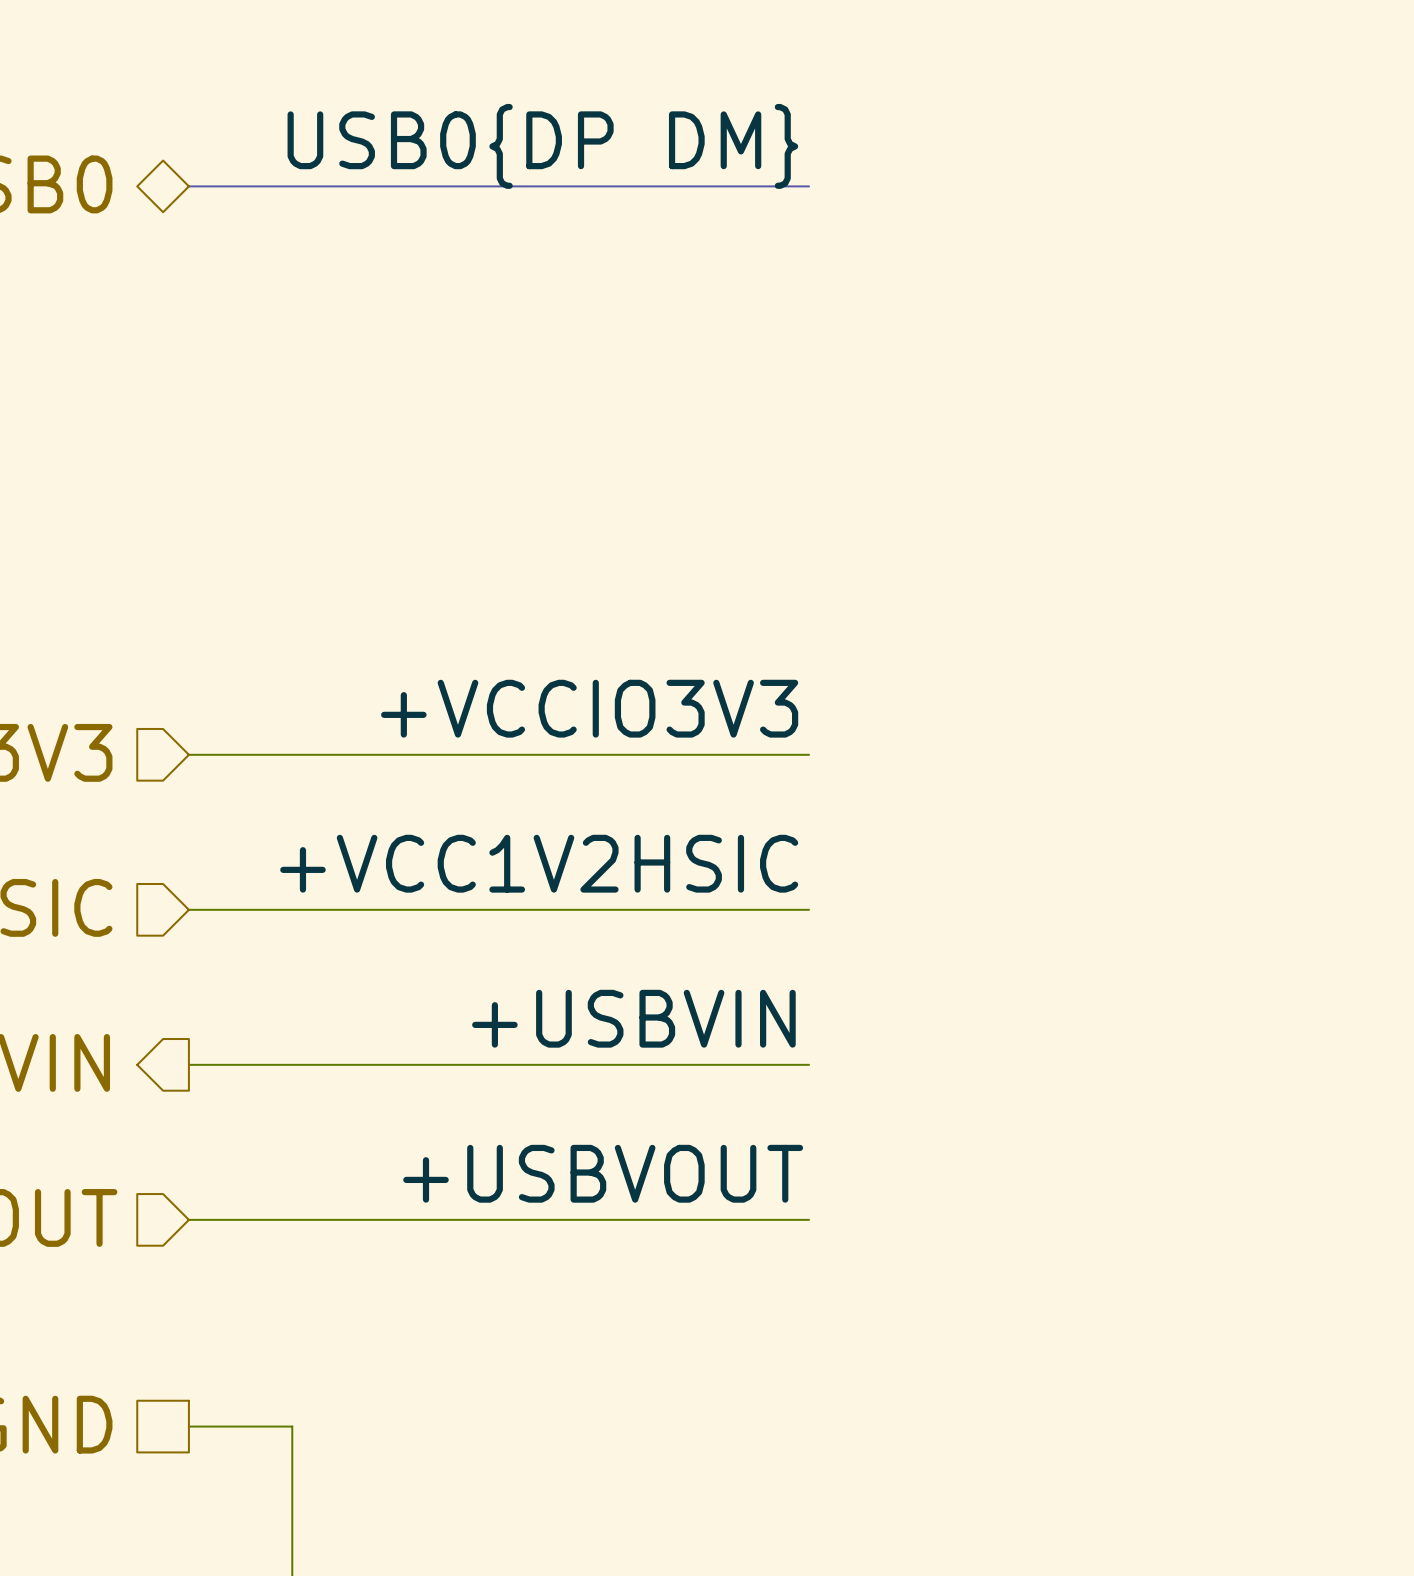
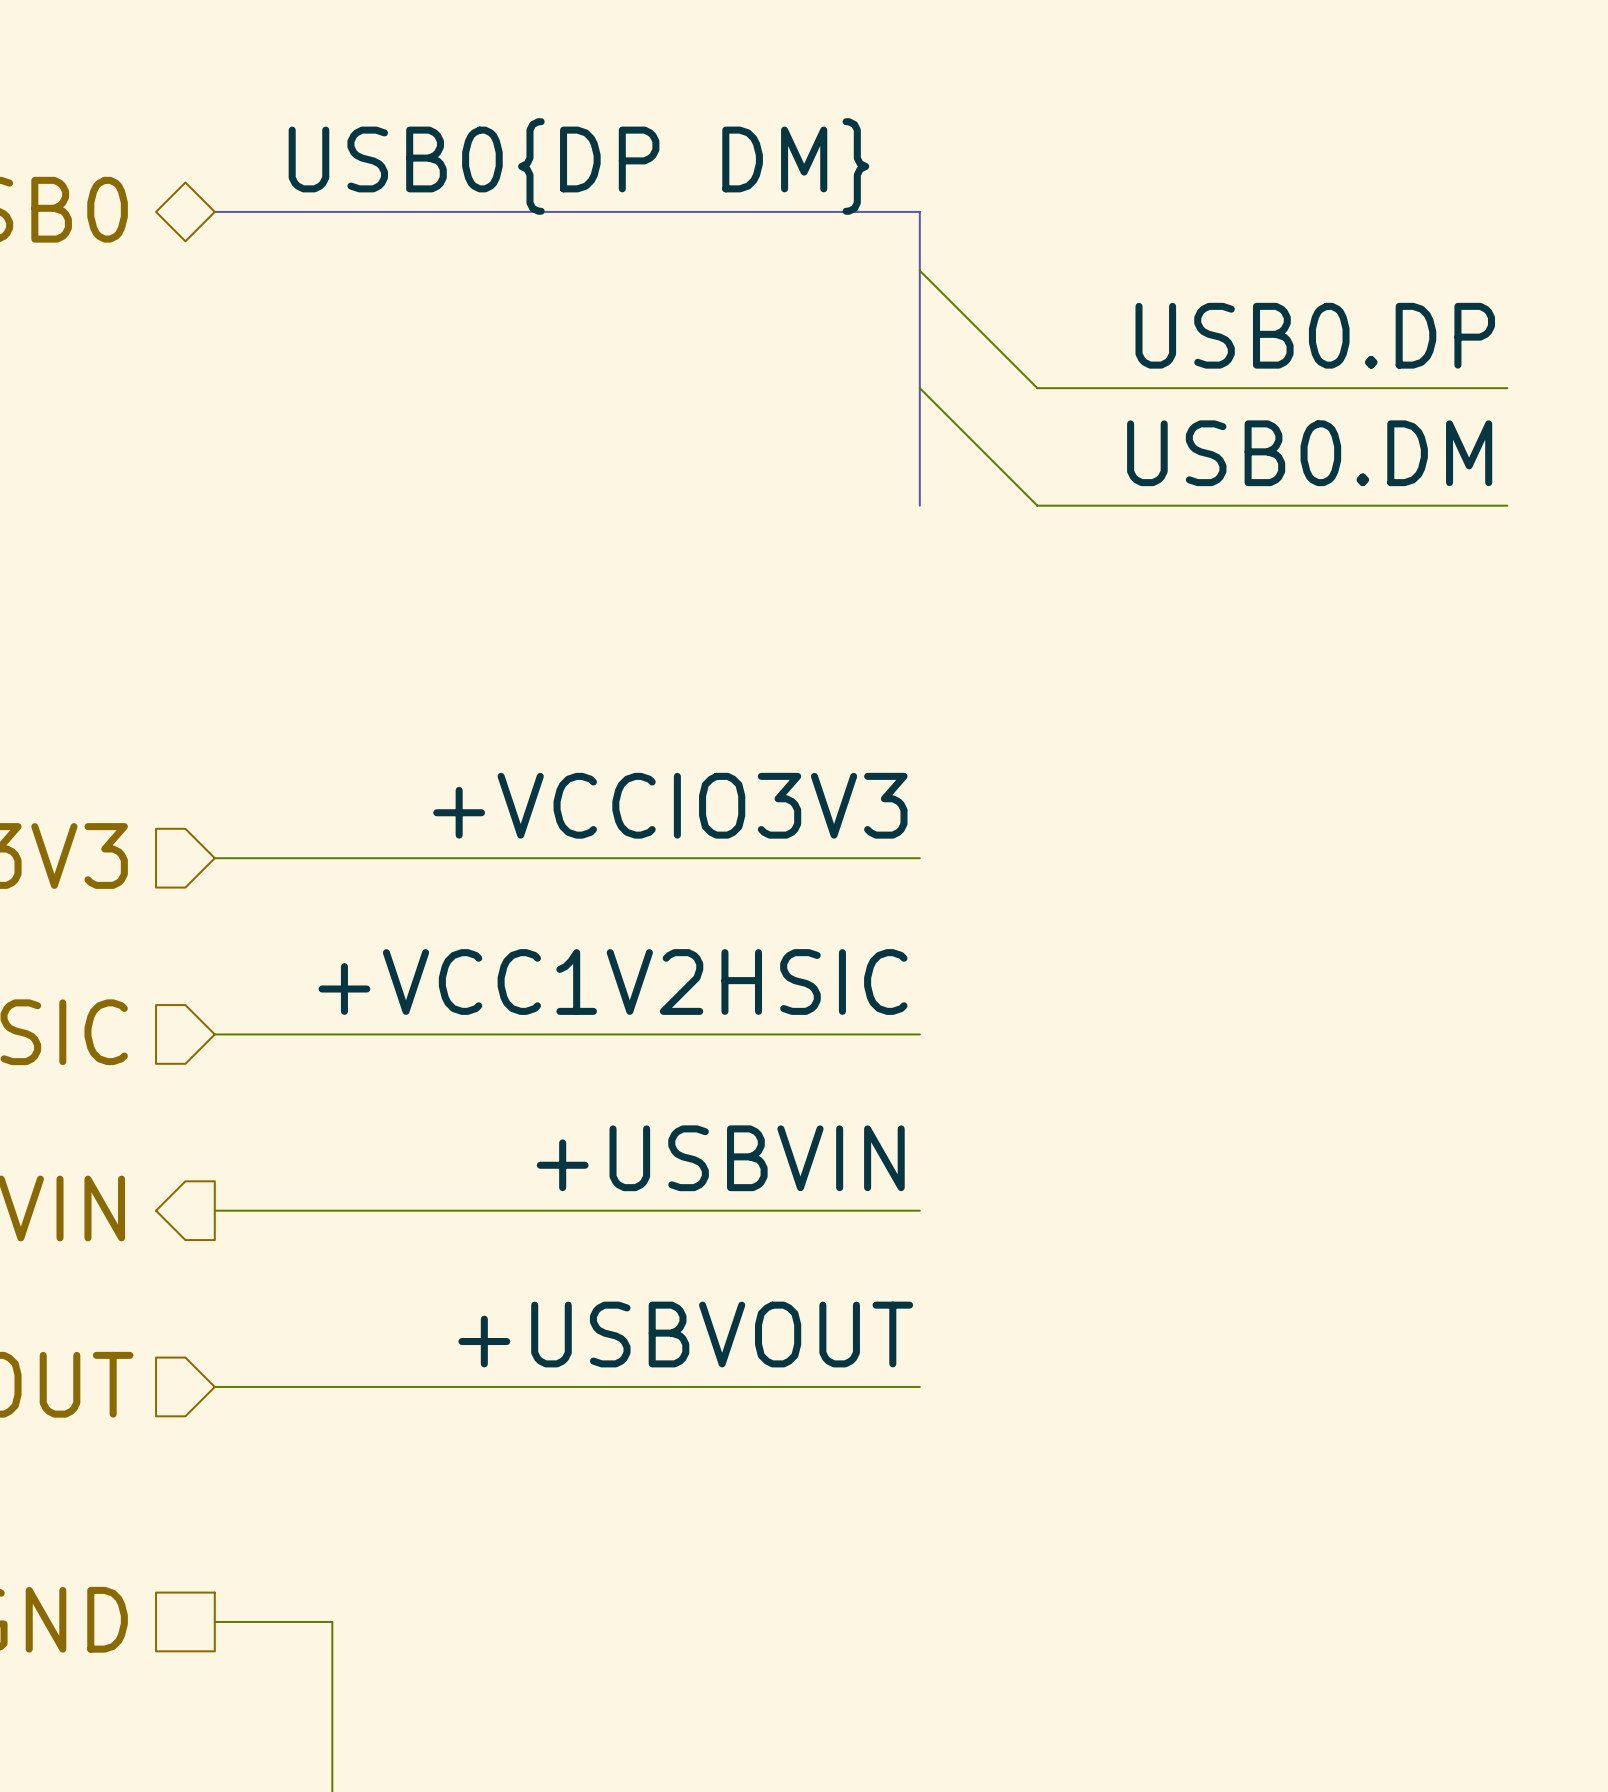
label position: USB0{DP DM} (542, 146) -> USB0{DP DM} (578, 166)
bus: none -> (919, 211) (919, 505)
wire: none -> (919, 270) (1037, 388) (1507, 388)
label: none -> USB0.DP (1315, 335)
wire: none -> (919, 388) (1037, 505) (1507, 505)
label: none -> USB0.DM (1309, 453)

